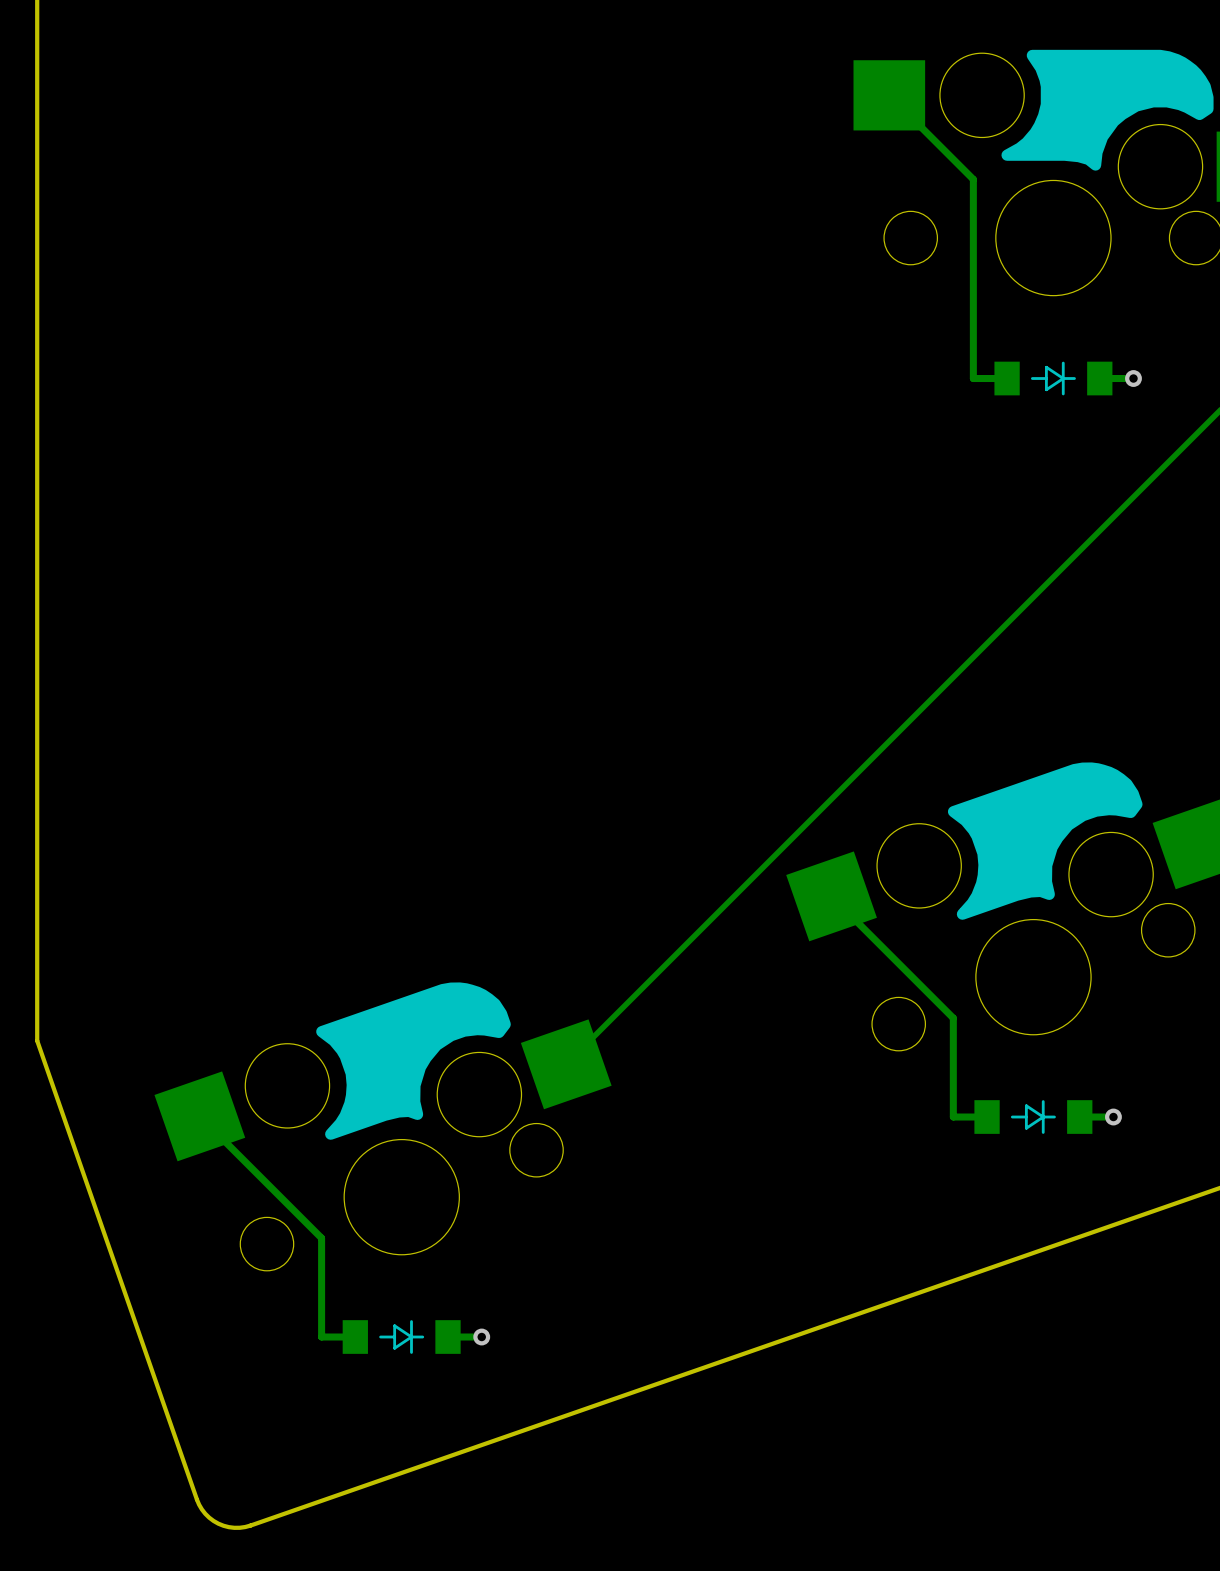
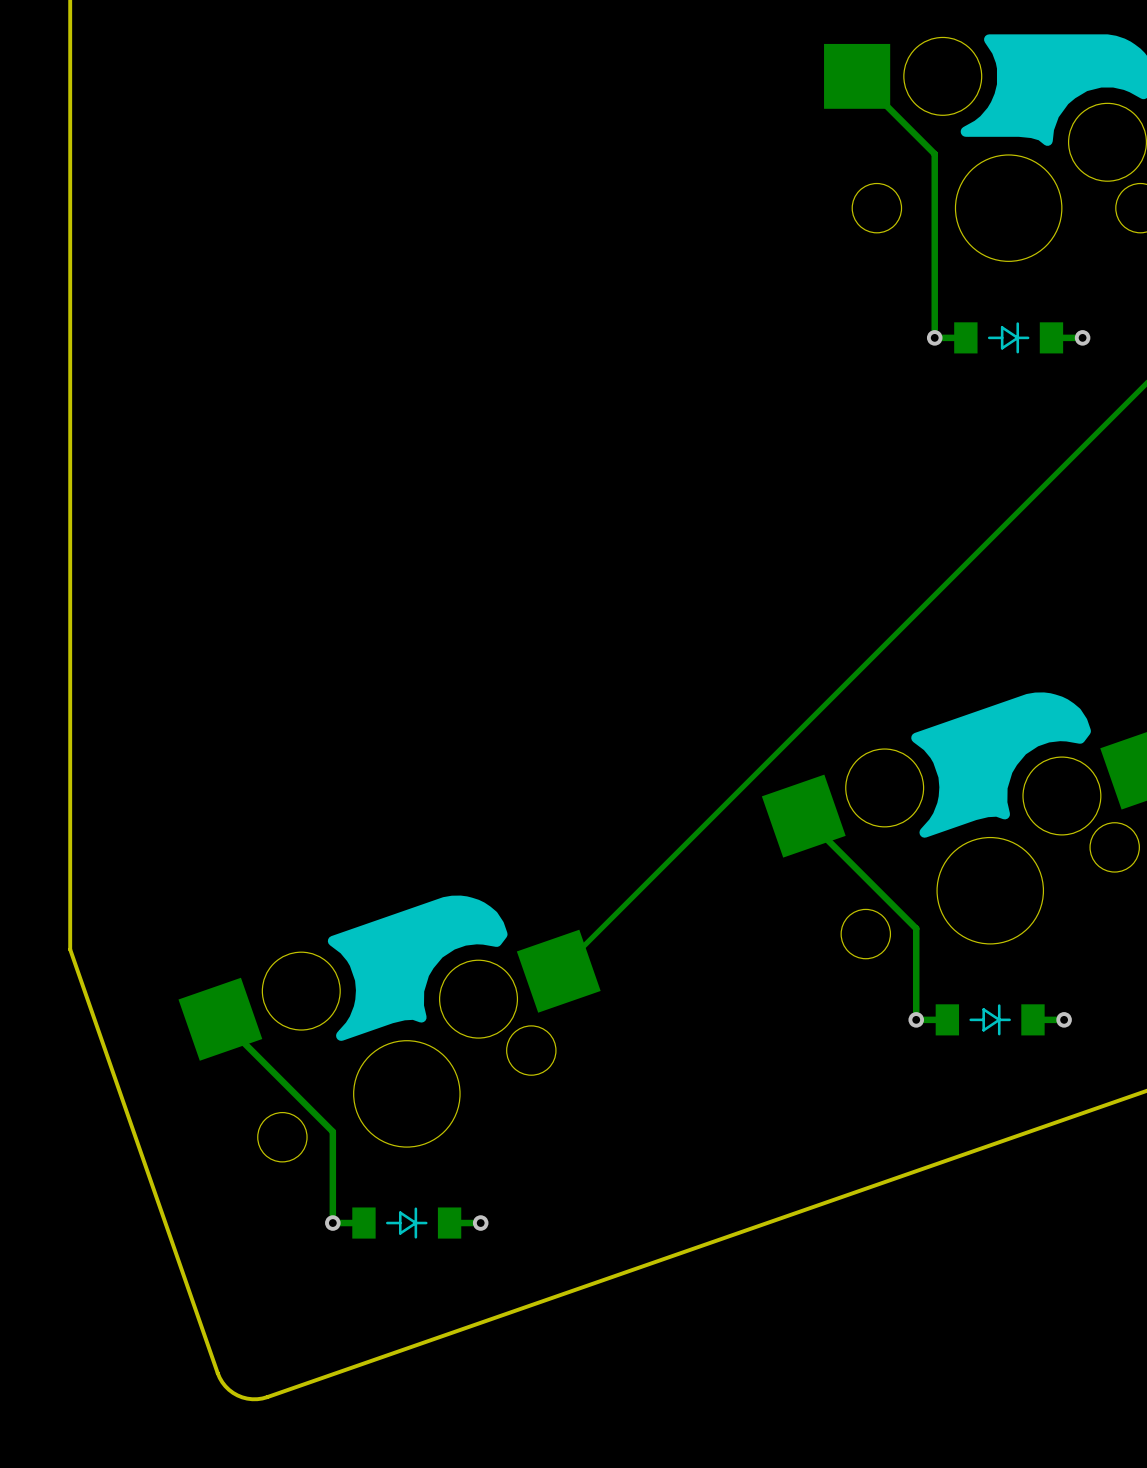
via: none -> (934, 337)
via: none -> (916, 1019)
via: none -> (332, 1223)

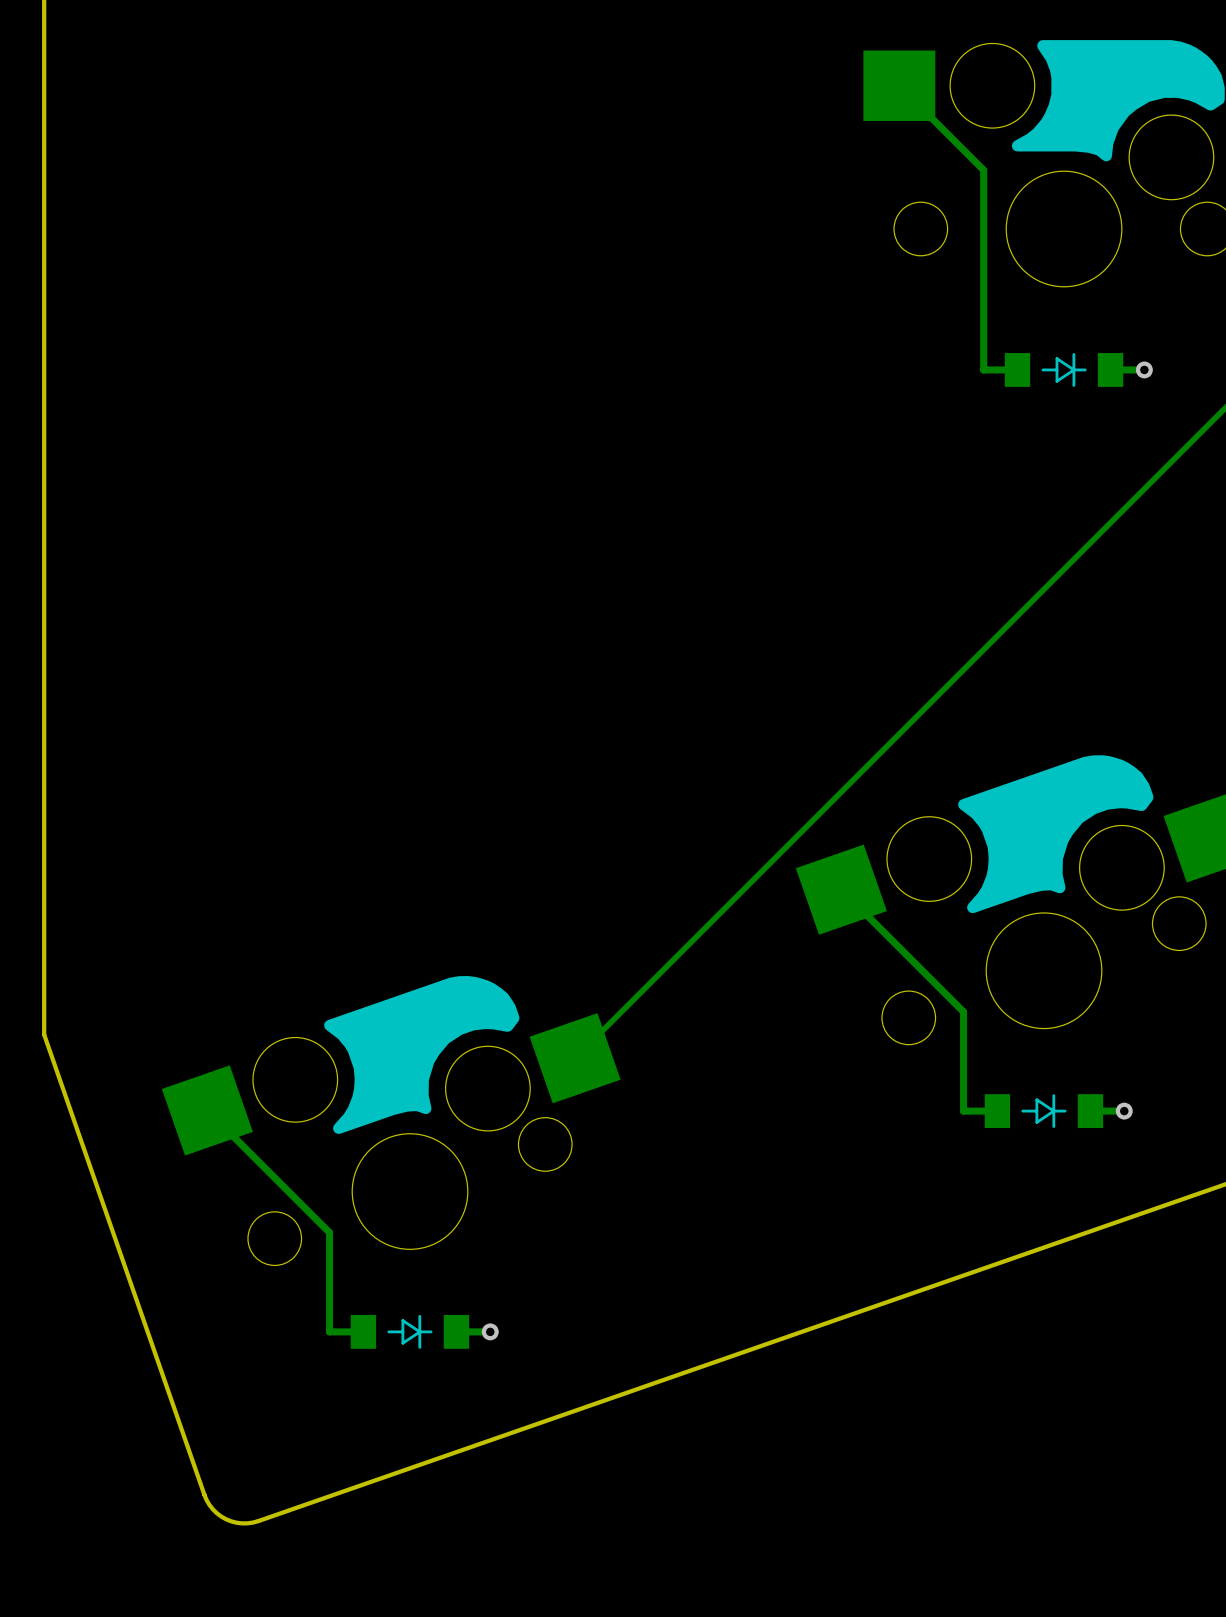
via: (934, 337) -> none
via: (916, 1019) -> none
via: (332, 1223) -> none

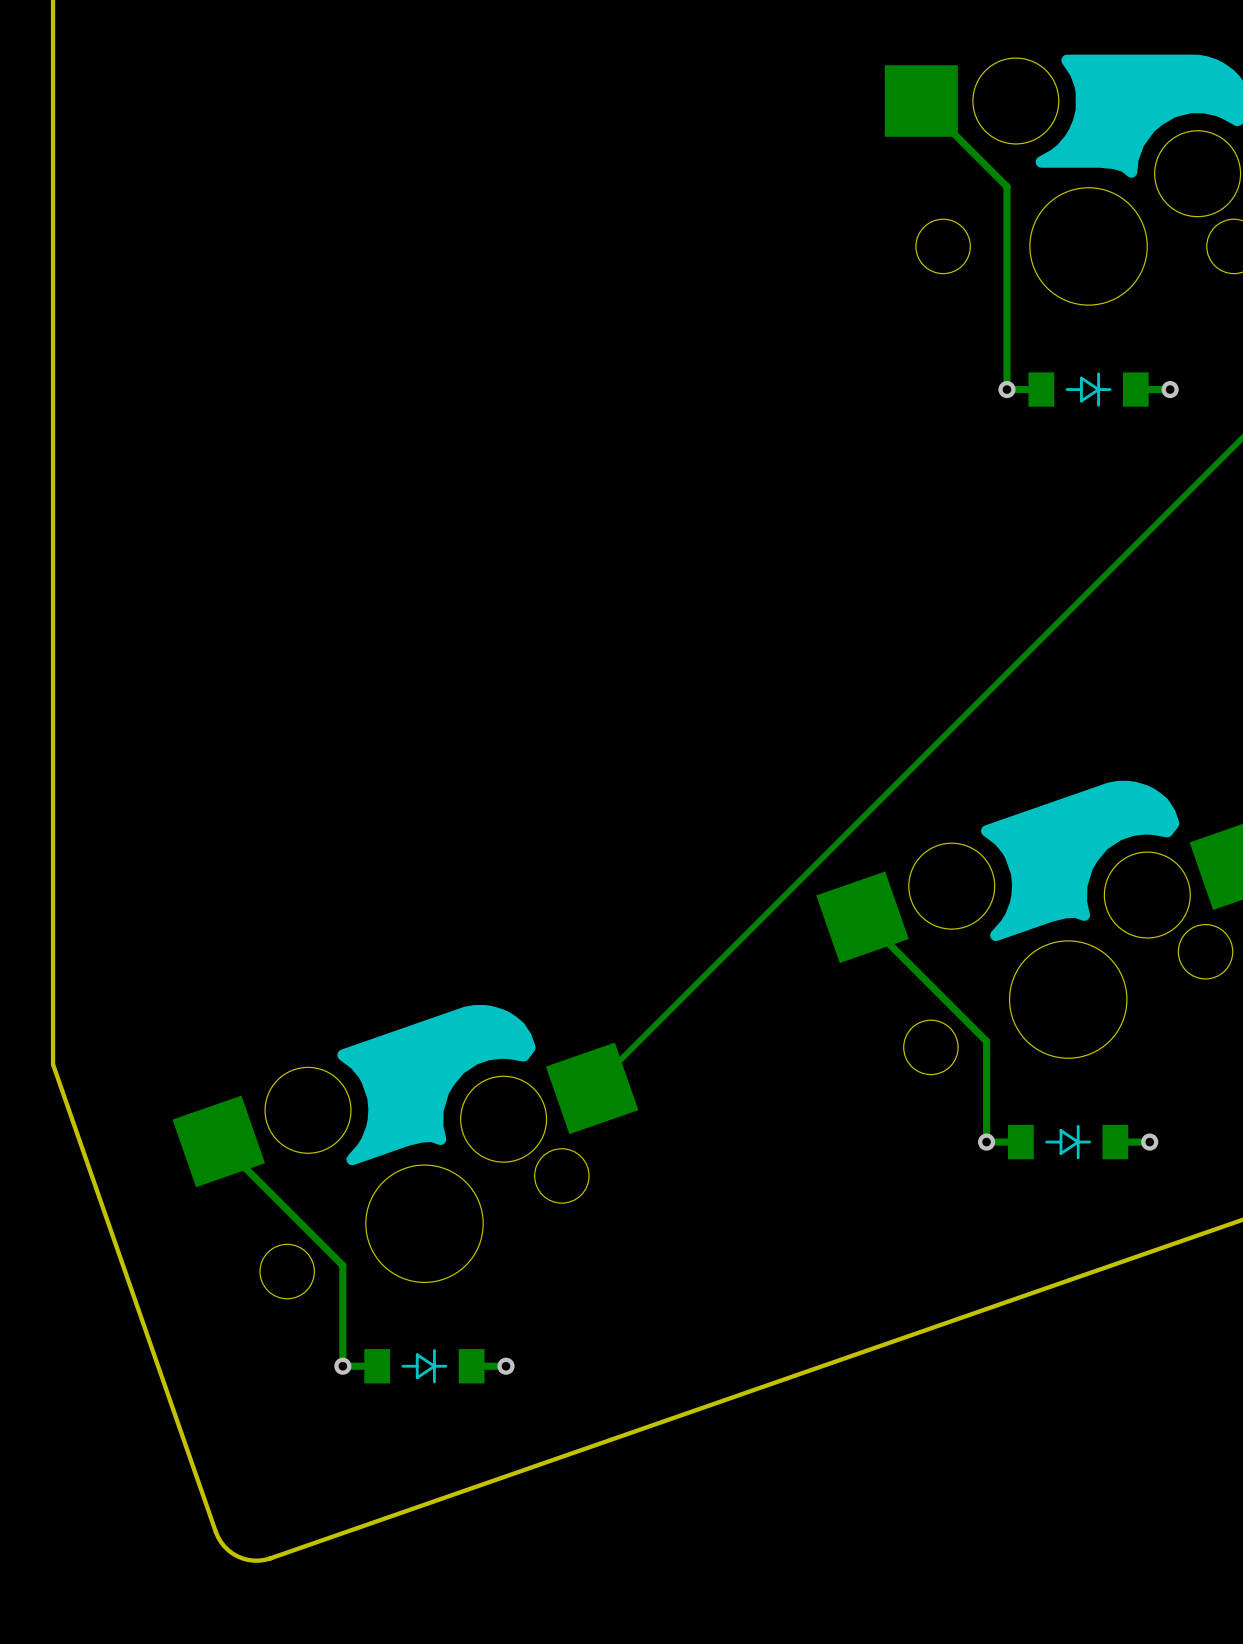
via: none -> (1006, 389)
via: none -> (986, 1142)
via: none -> (342, 1366)

